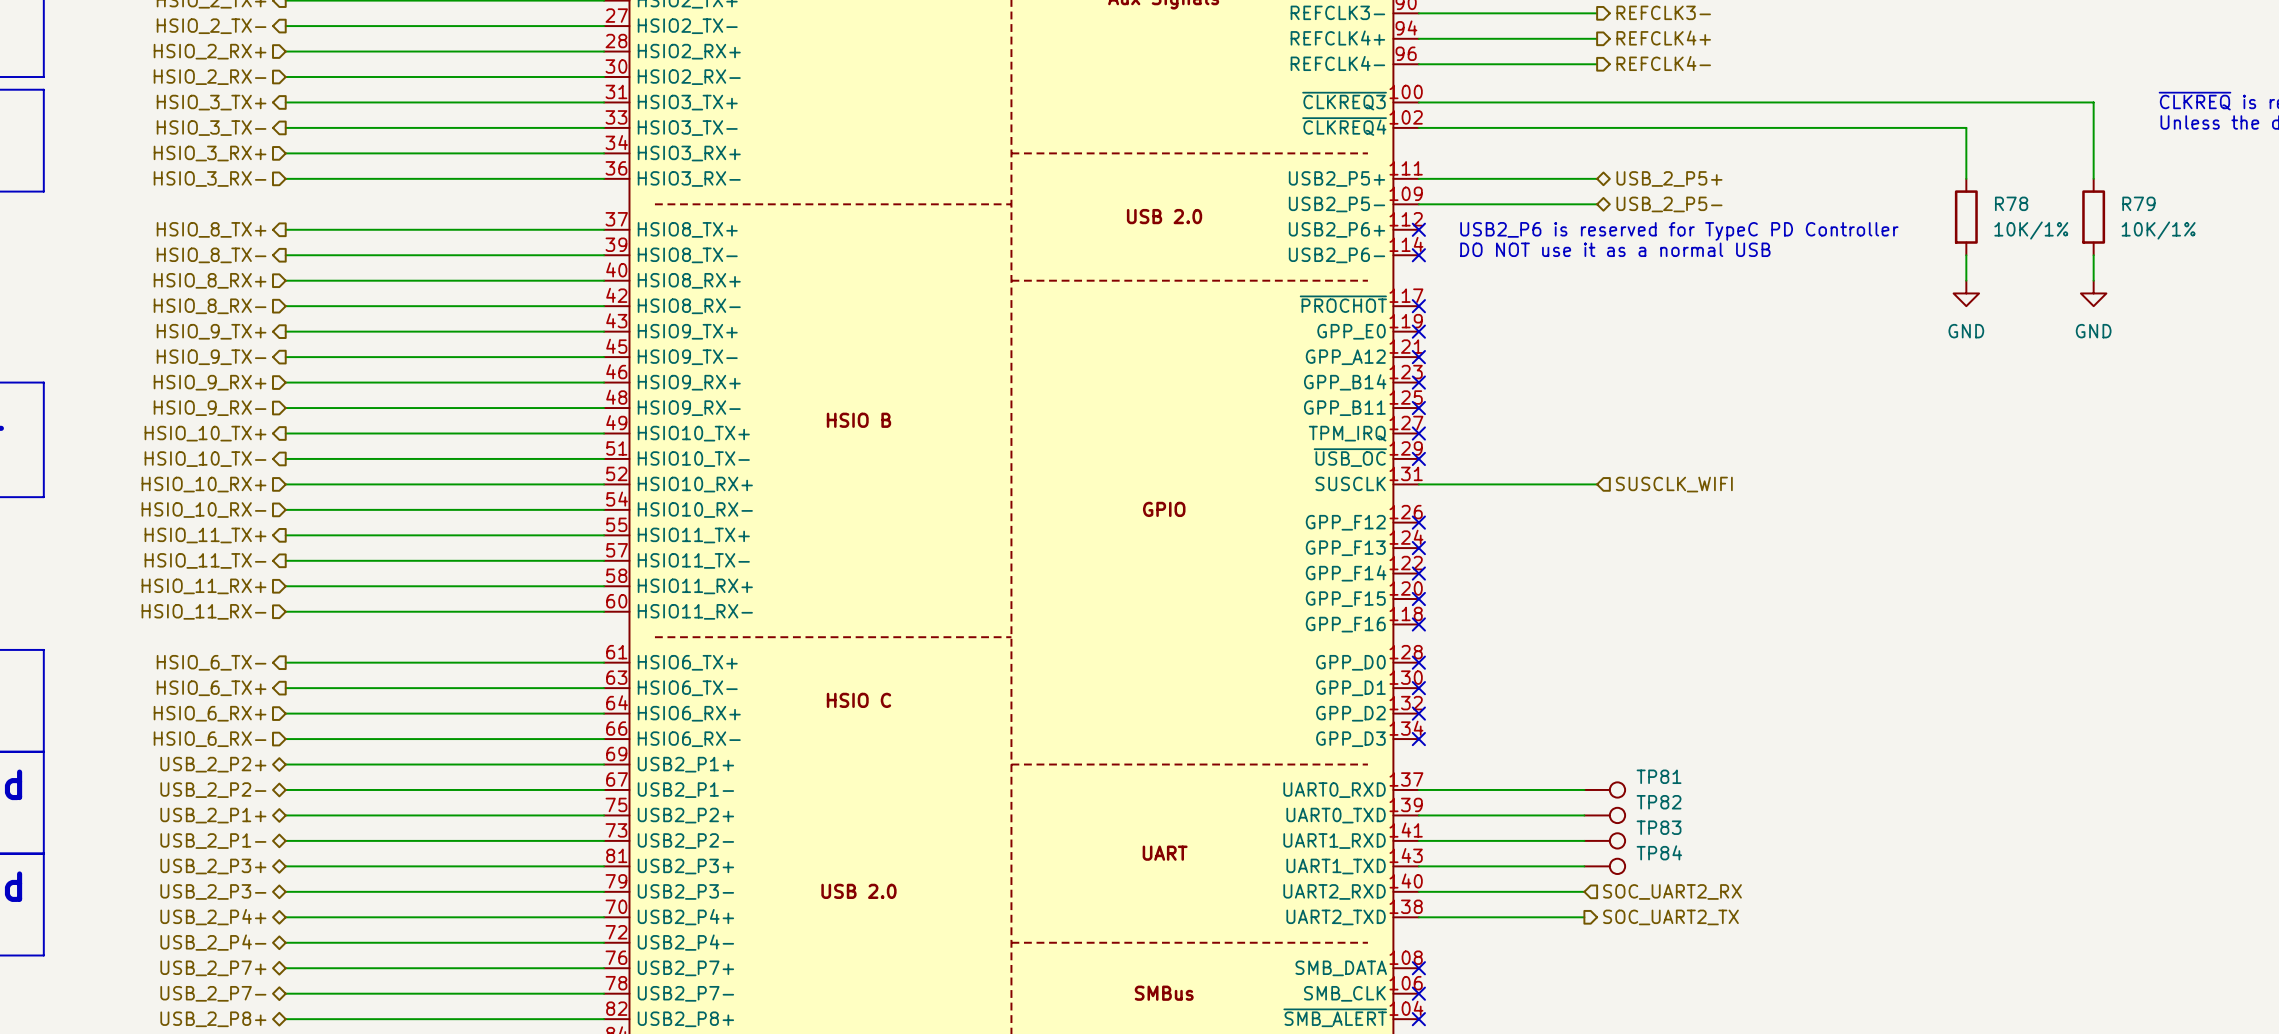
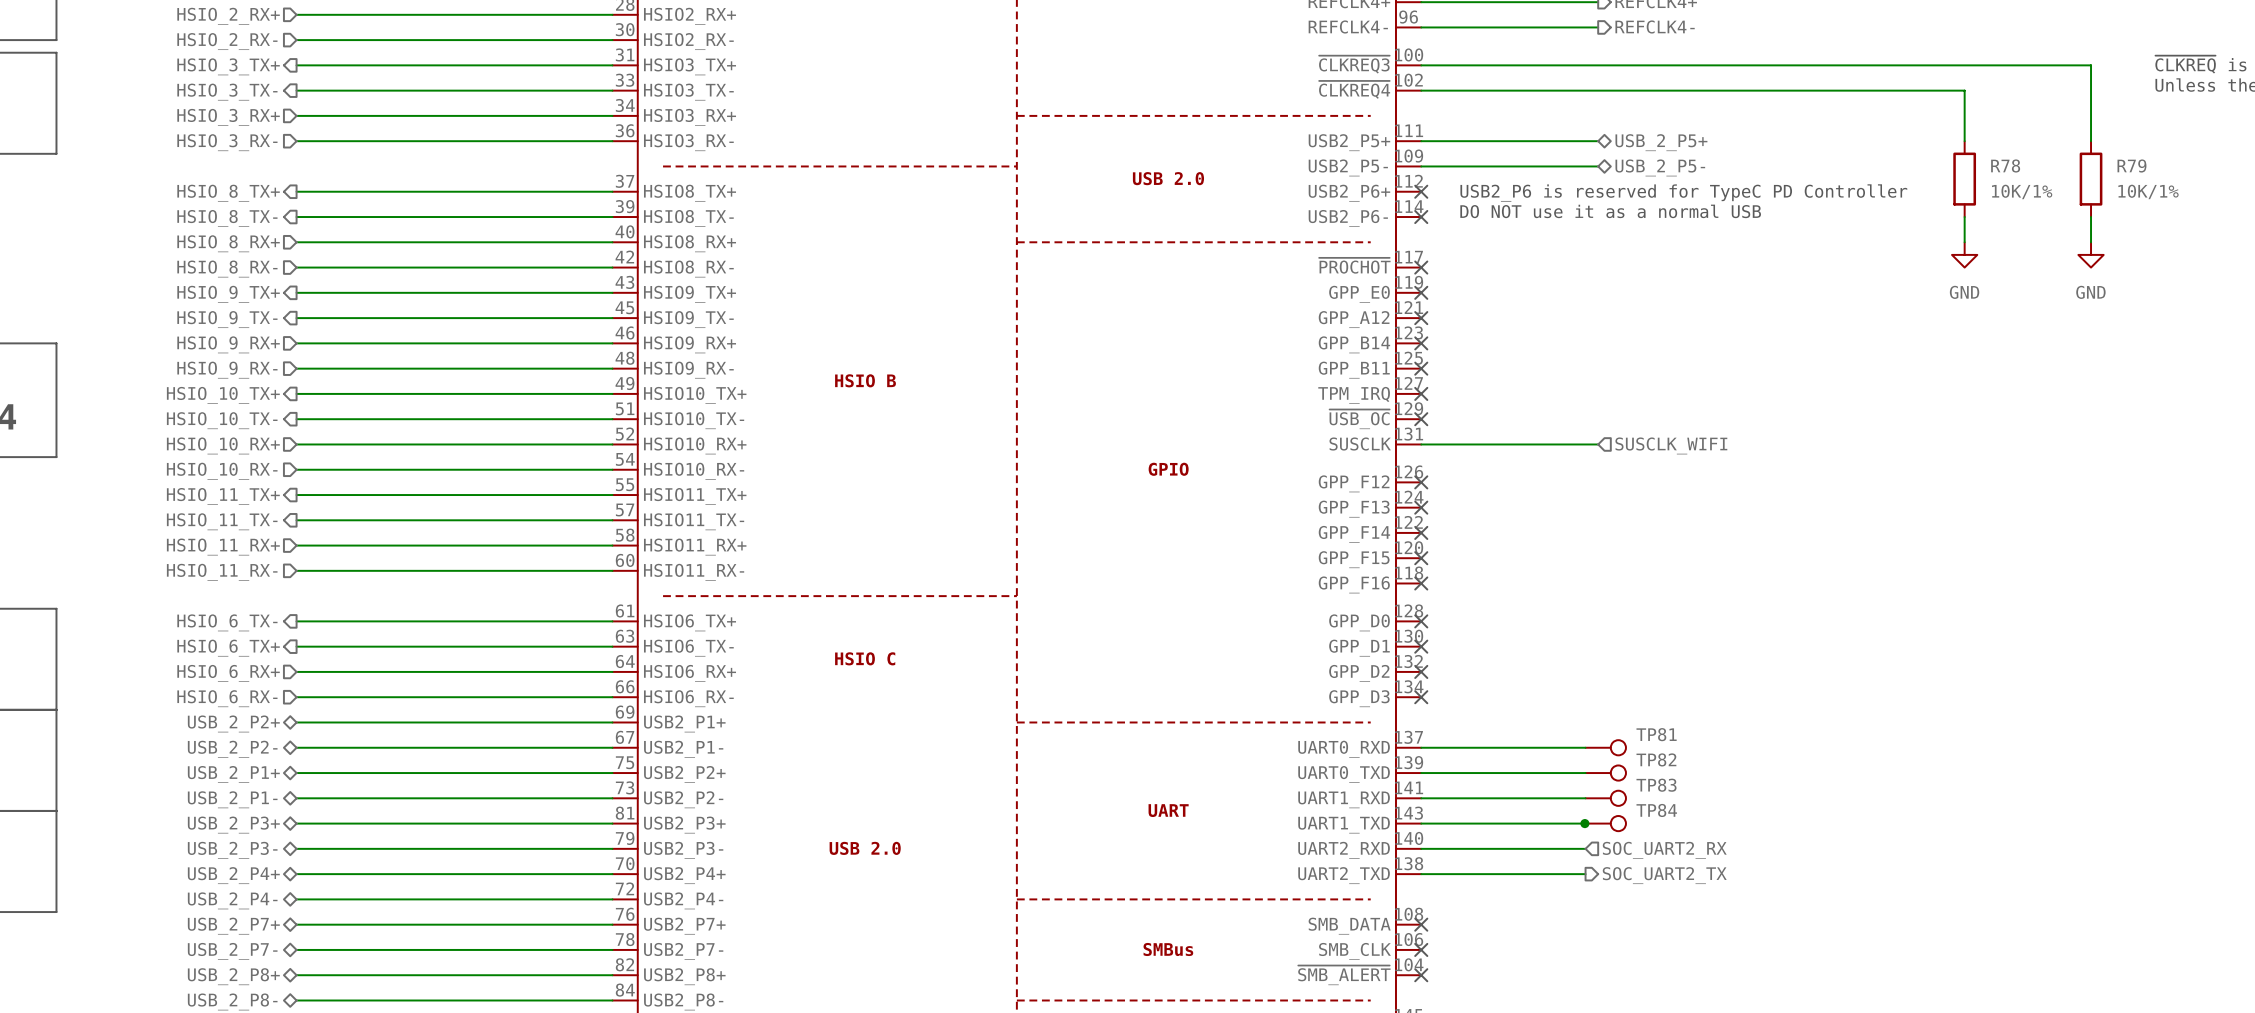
junction: none -> (1584, 823)

